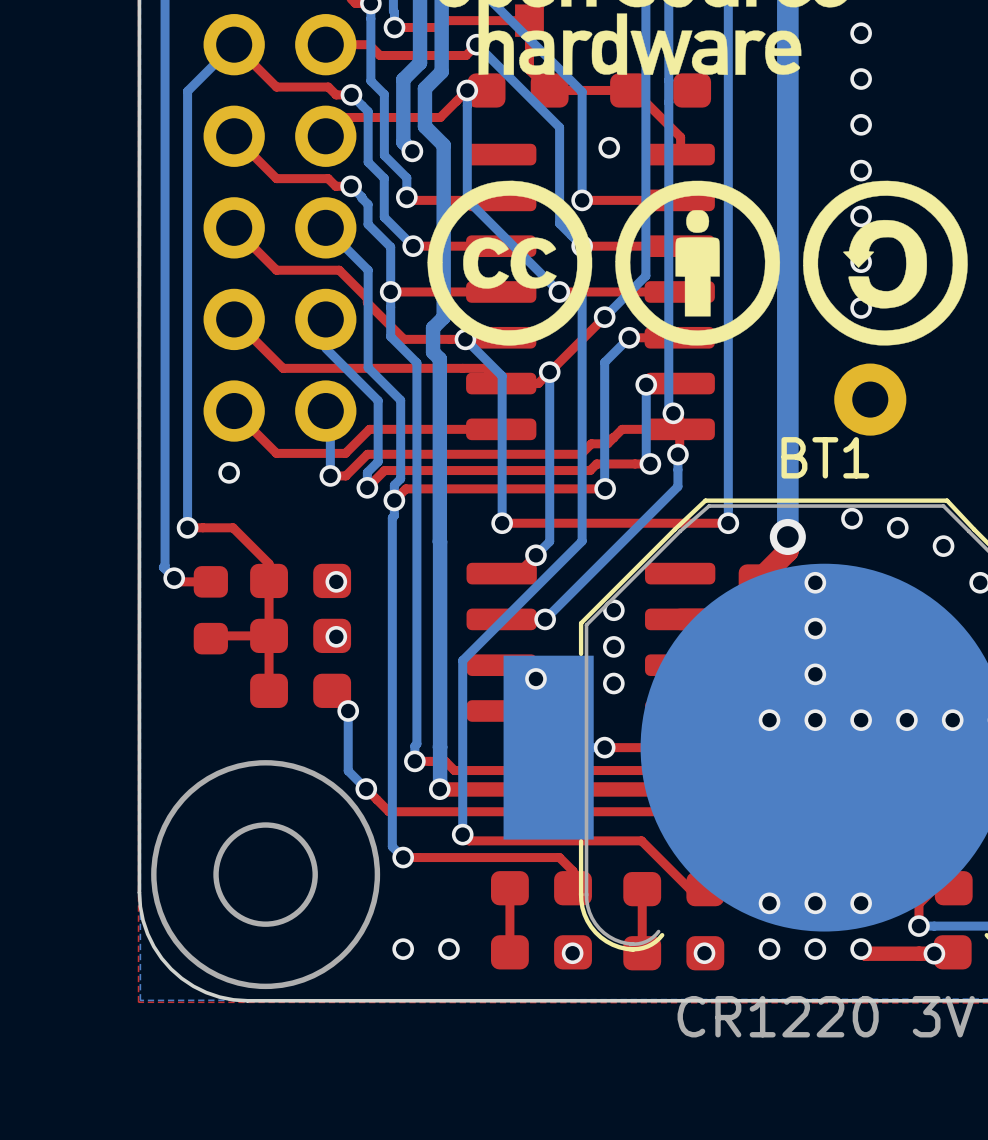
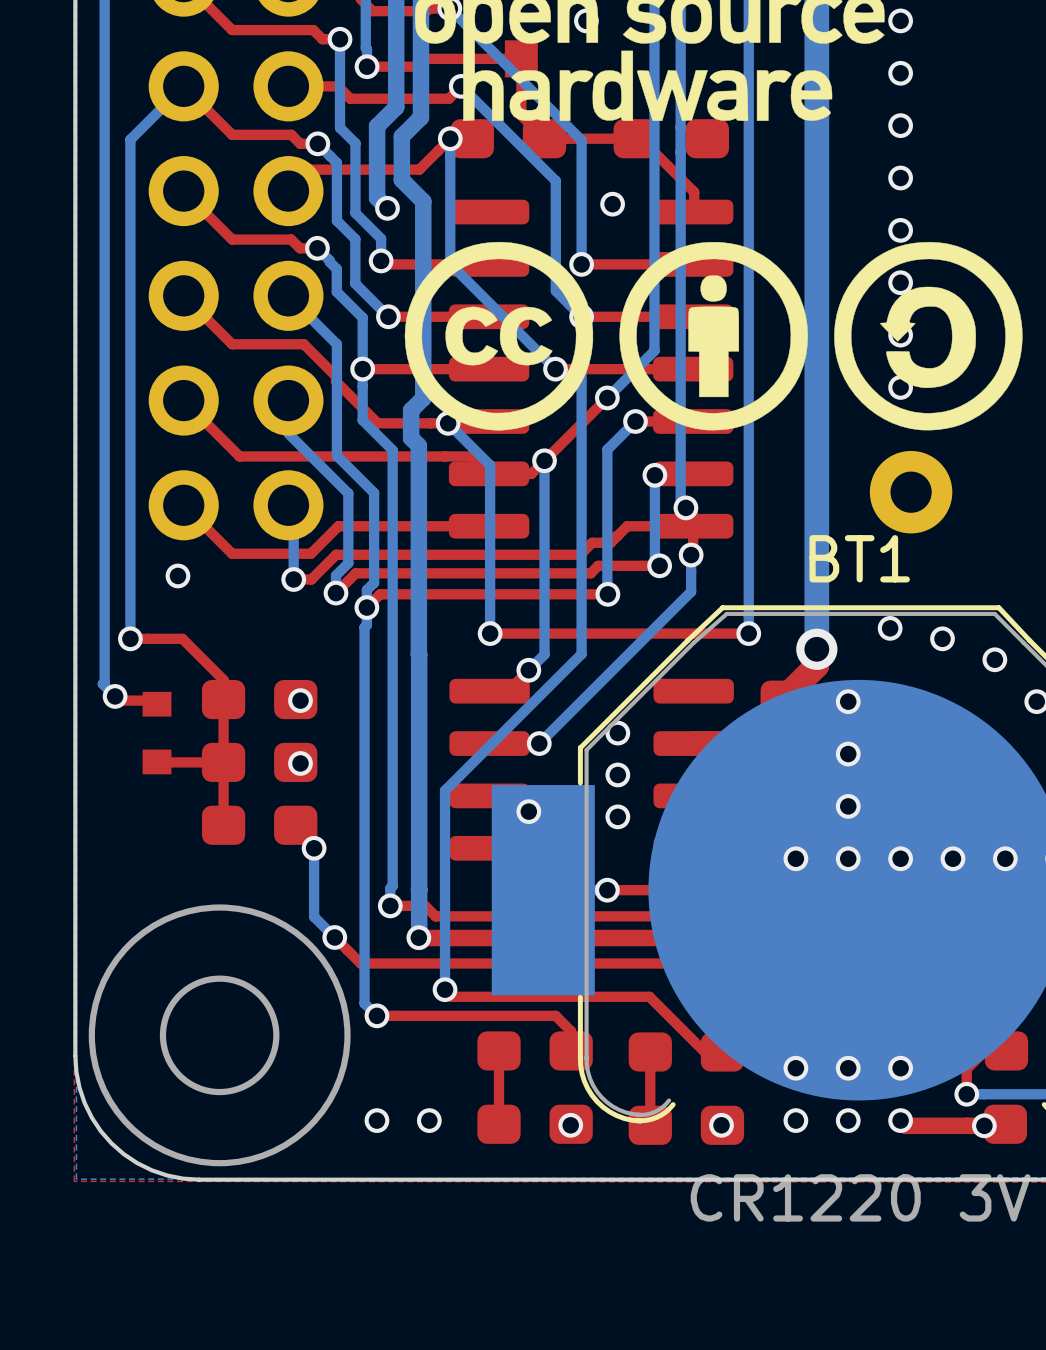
part footprint: [193, 566, 228, 655] -> [142, 691, 172, 775]

